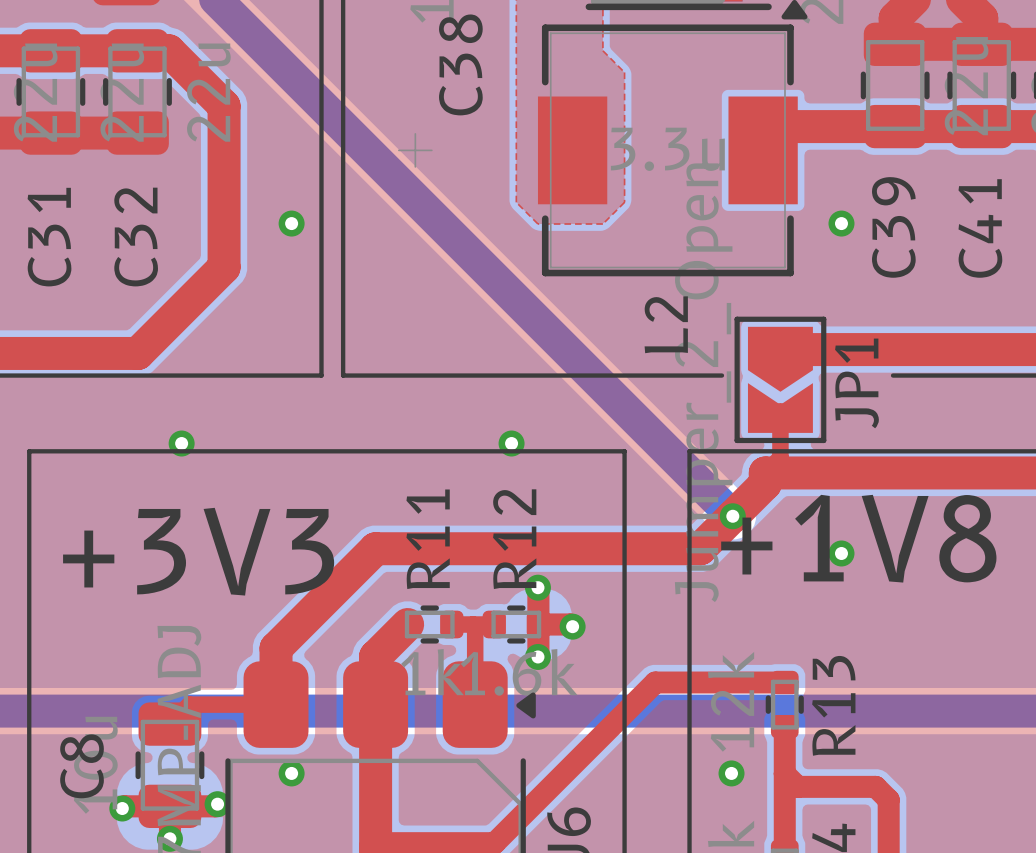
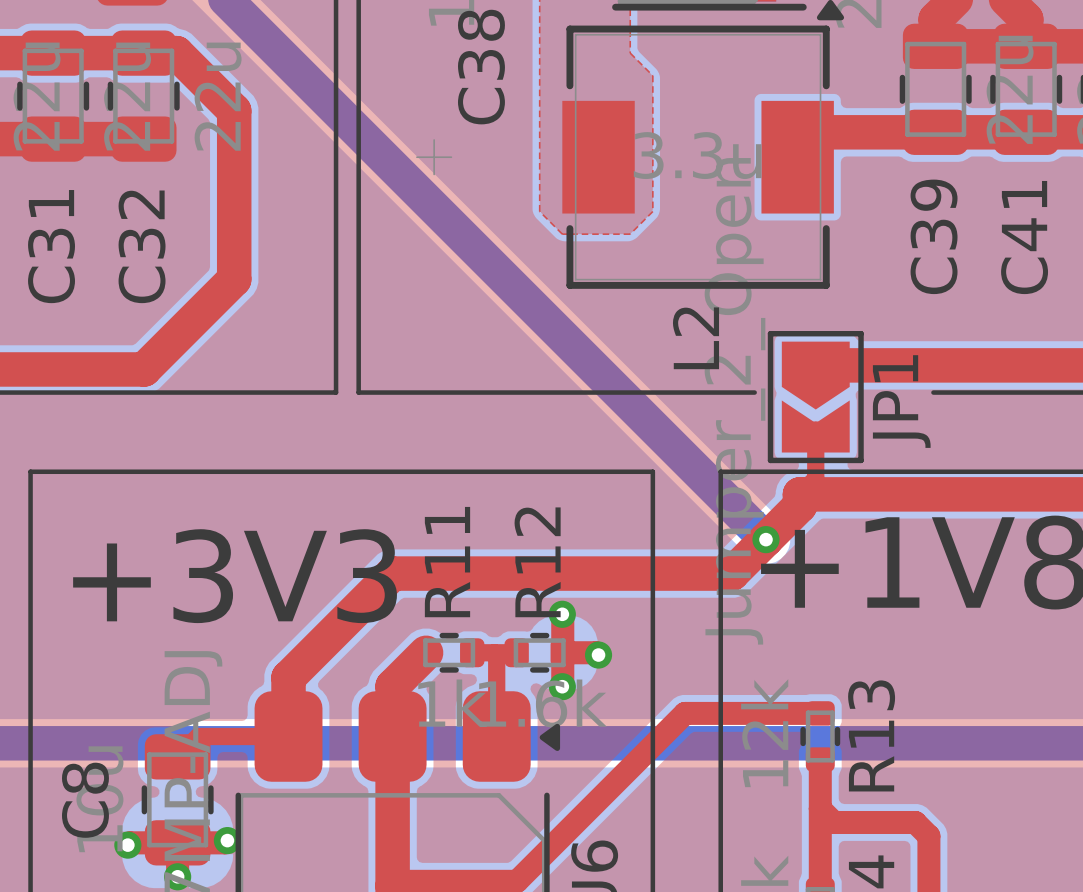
via: (291, 223) -> none
via: (841, 223) -> none
via: (181, 443) -> none
via: (511, 443) -> none
via: (841, 553) -> none
via: (291, 773) -> none
via: (731, 773) -> none

